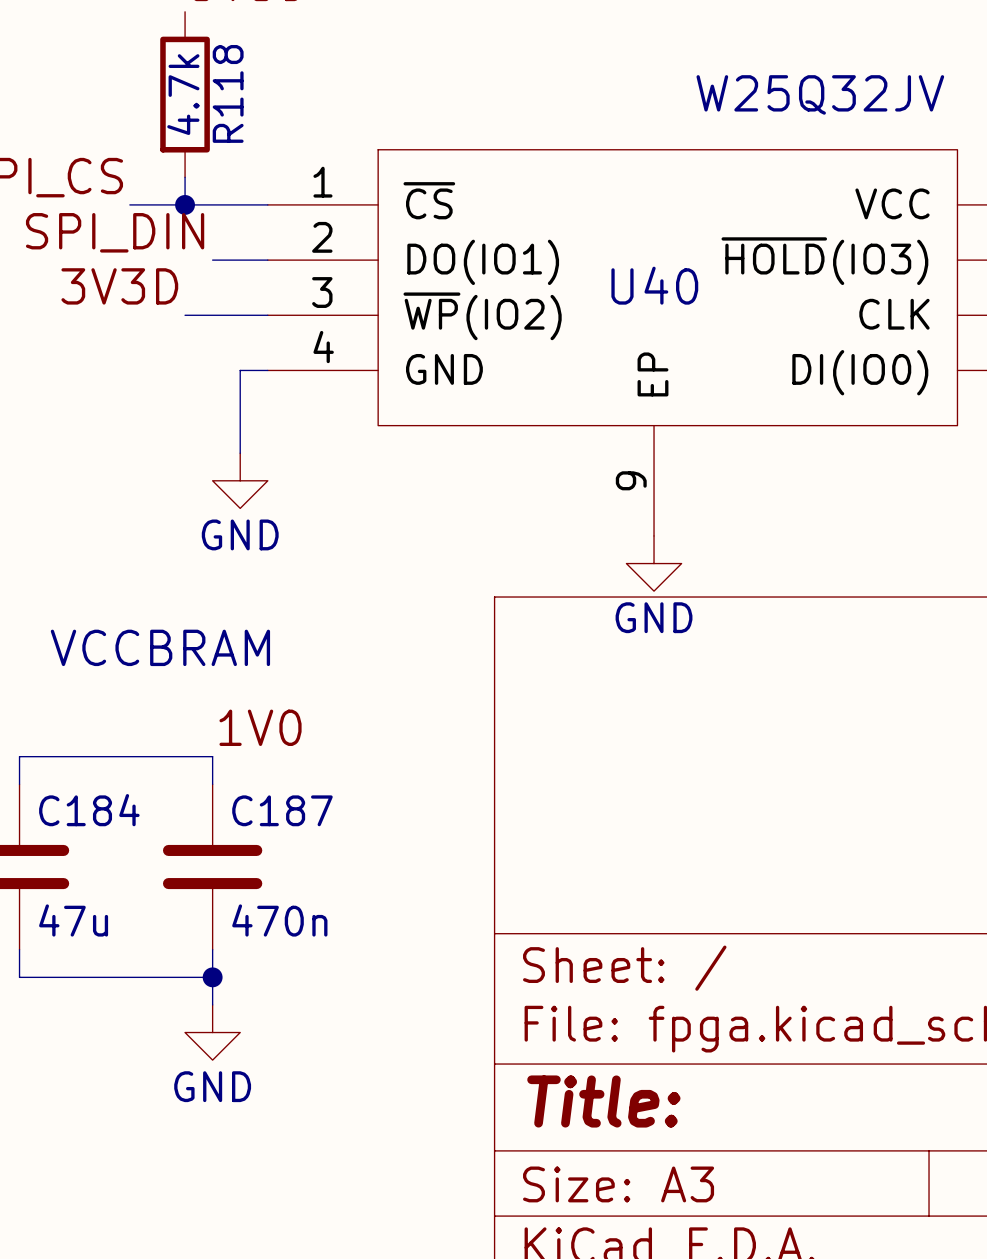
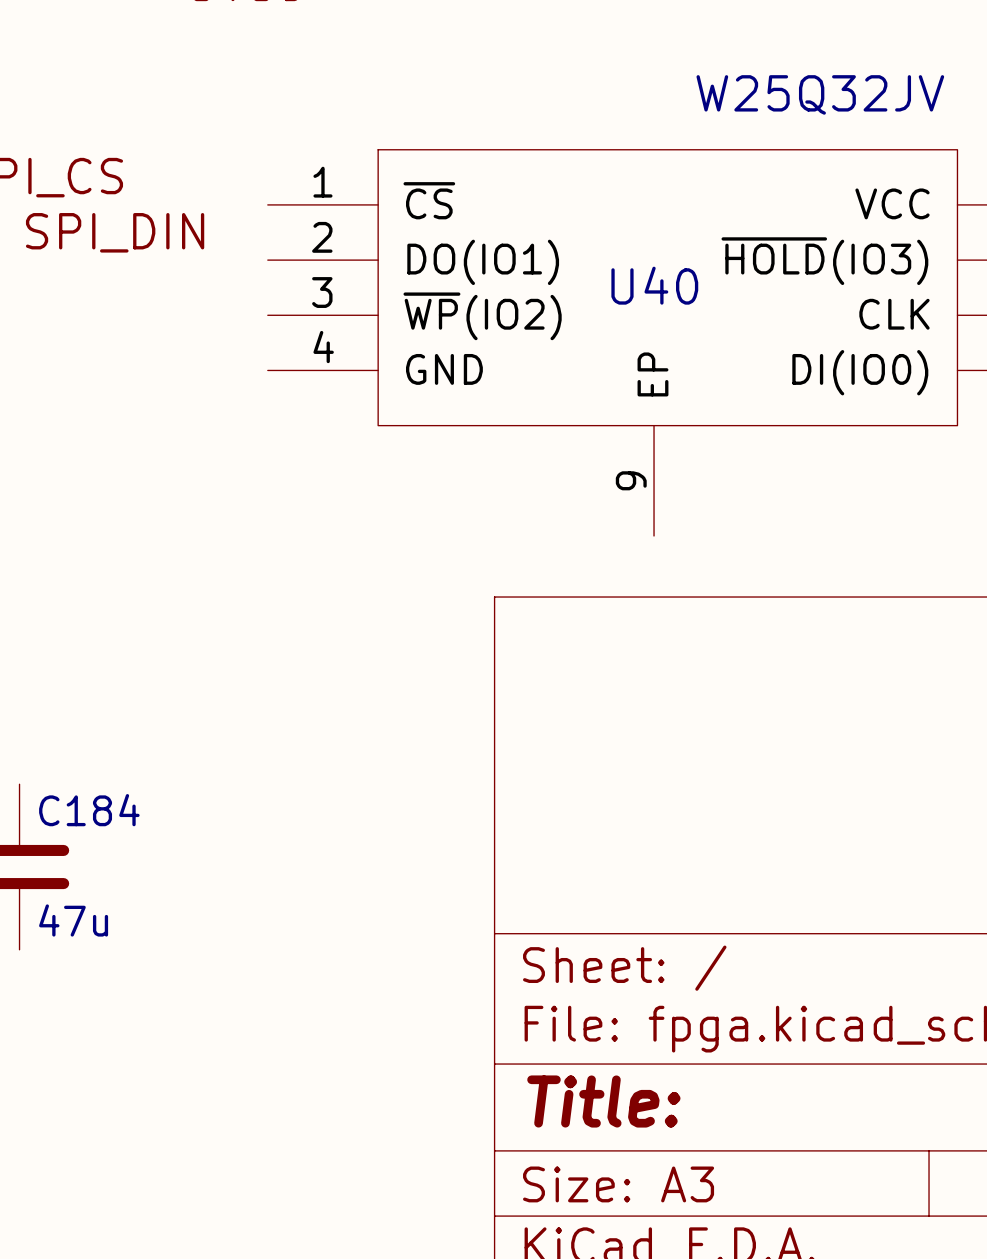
R118: 4.7k (185, 94) -> none
wire: (185, 177) (185, 204) -> none
wire: (129, 204) (267, 204) -> none
junction: (185, 204) -> none
wire: (212, 260) (267, 260) -> none
label: 3V3D (119, 286) -> none
wire: (185, 315) (267, 315) -> none
wire: (267, 370) (240, 370) (240, 453) -> none
power symbol: GND (240, 480) -> none
power symbol: GND (654, 563) -> none
text: VCCBRAM (160, 647) -> none
label: 1V0 (260, 727) -> none
wire: (19, 784) (19, 756) (212, 756) (212, 784) -> none
C187: 470n (212, 867) -> none
wire: (19, 949) (19, 977) (212, 977) -> none
wire: (212, 949) (212, 1004) -> none
junction: (212, 977) -> none
power symbol: GND (212, 1032) -> none

